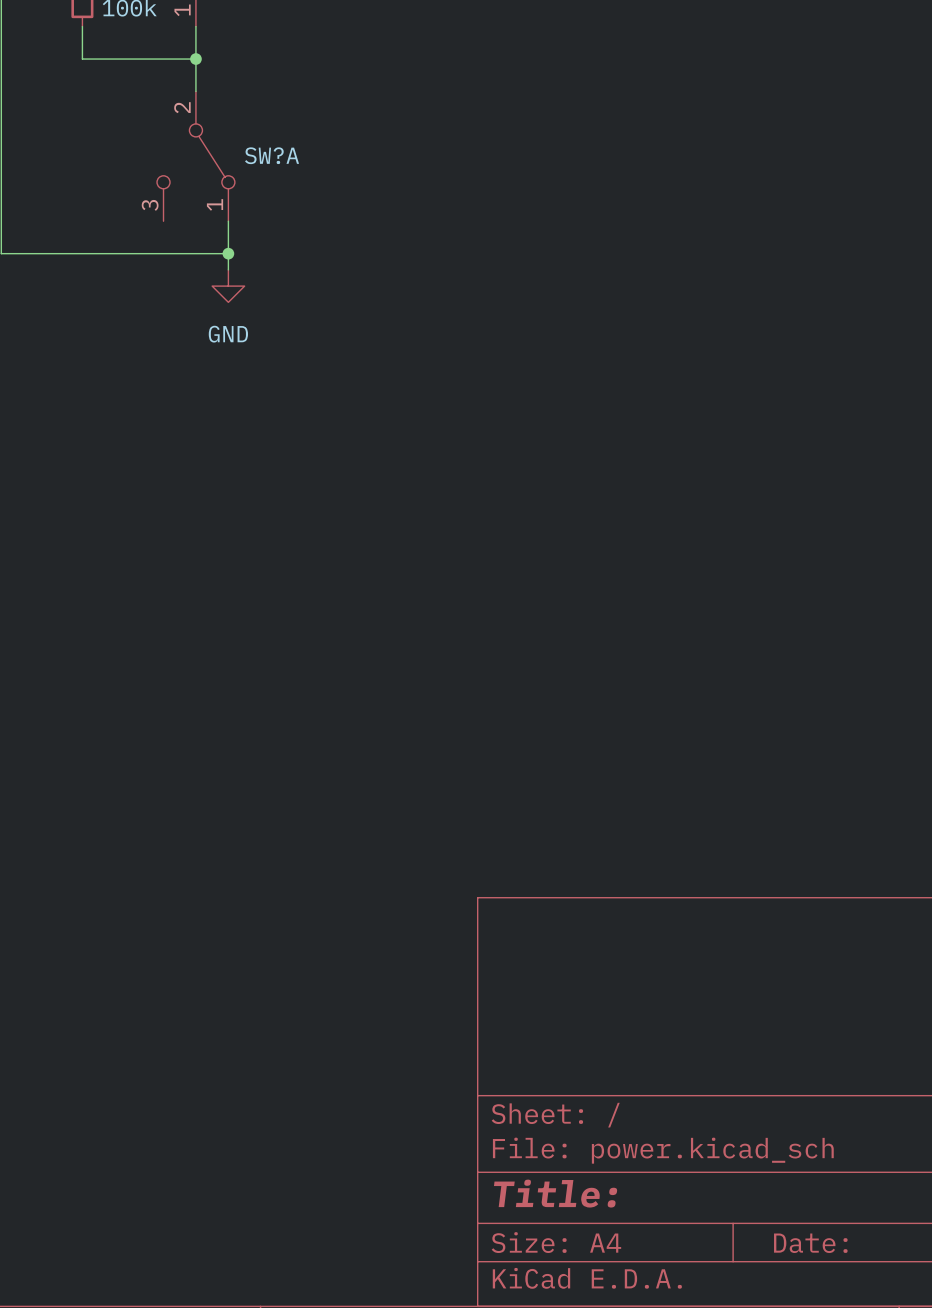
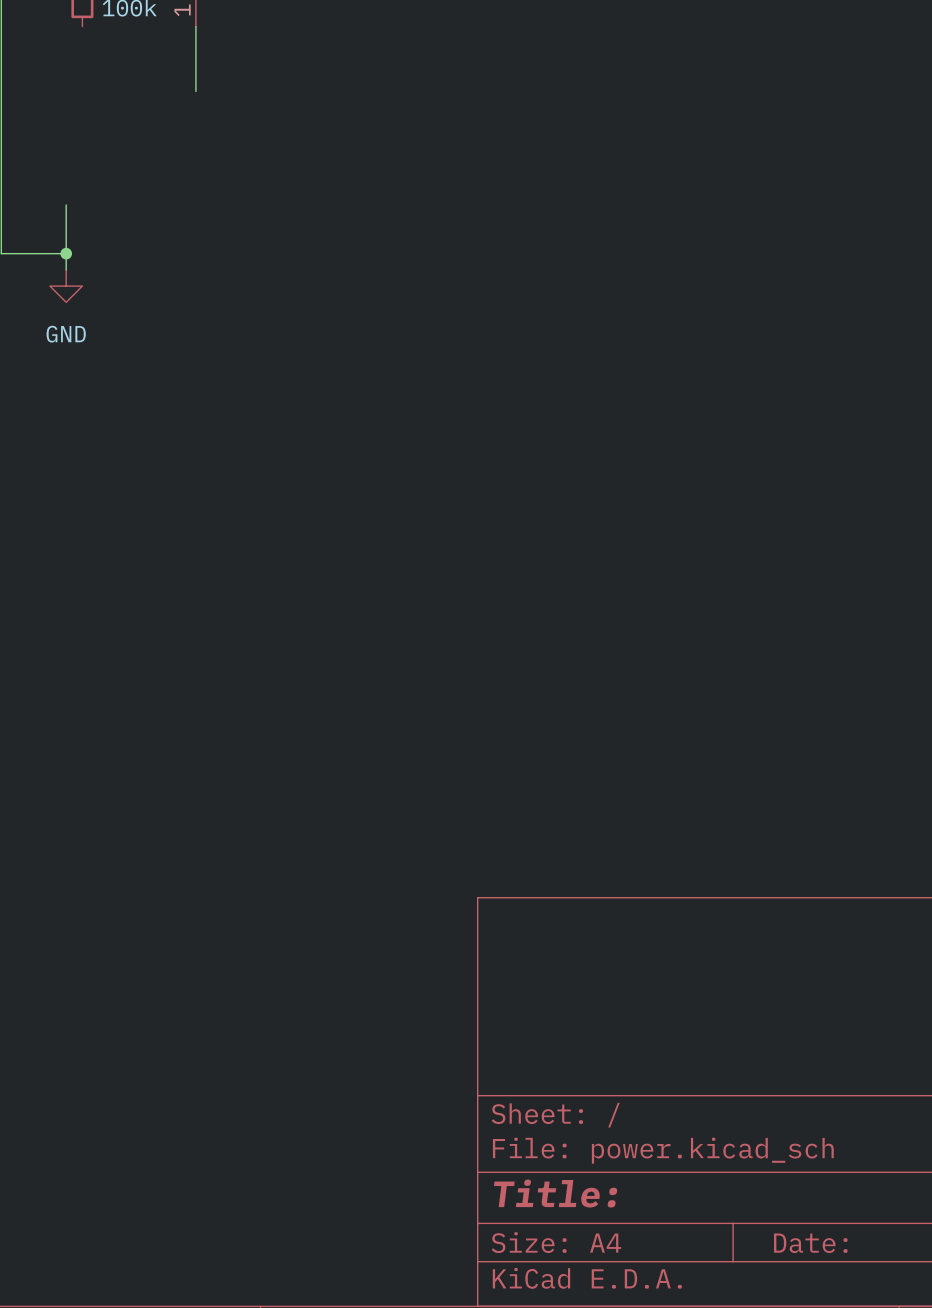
wire: (82, 26) (82, 59) (195, 59) -> none
junction: (195, 59) -> none
SW?A: (195, 156) -> none
wire: none -> (66, 205) (66, 269)
wire: (228, 221) (228, 269) -> none
wire: (66, 253) (228, 253) -> none
junction: none -> (66, 253)
junction: (228, 253) -> none
power symbol position: GND (228, 286) -> GND (66, 286)

